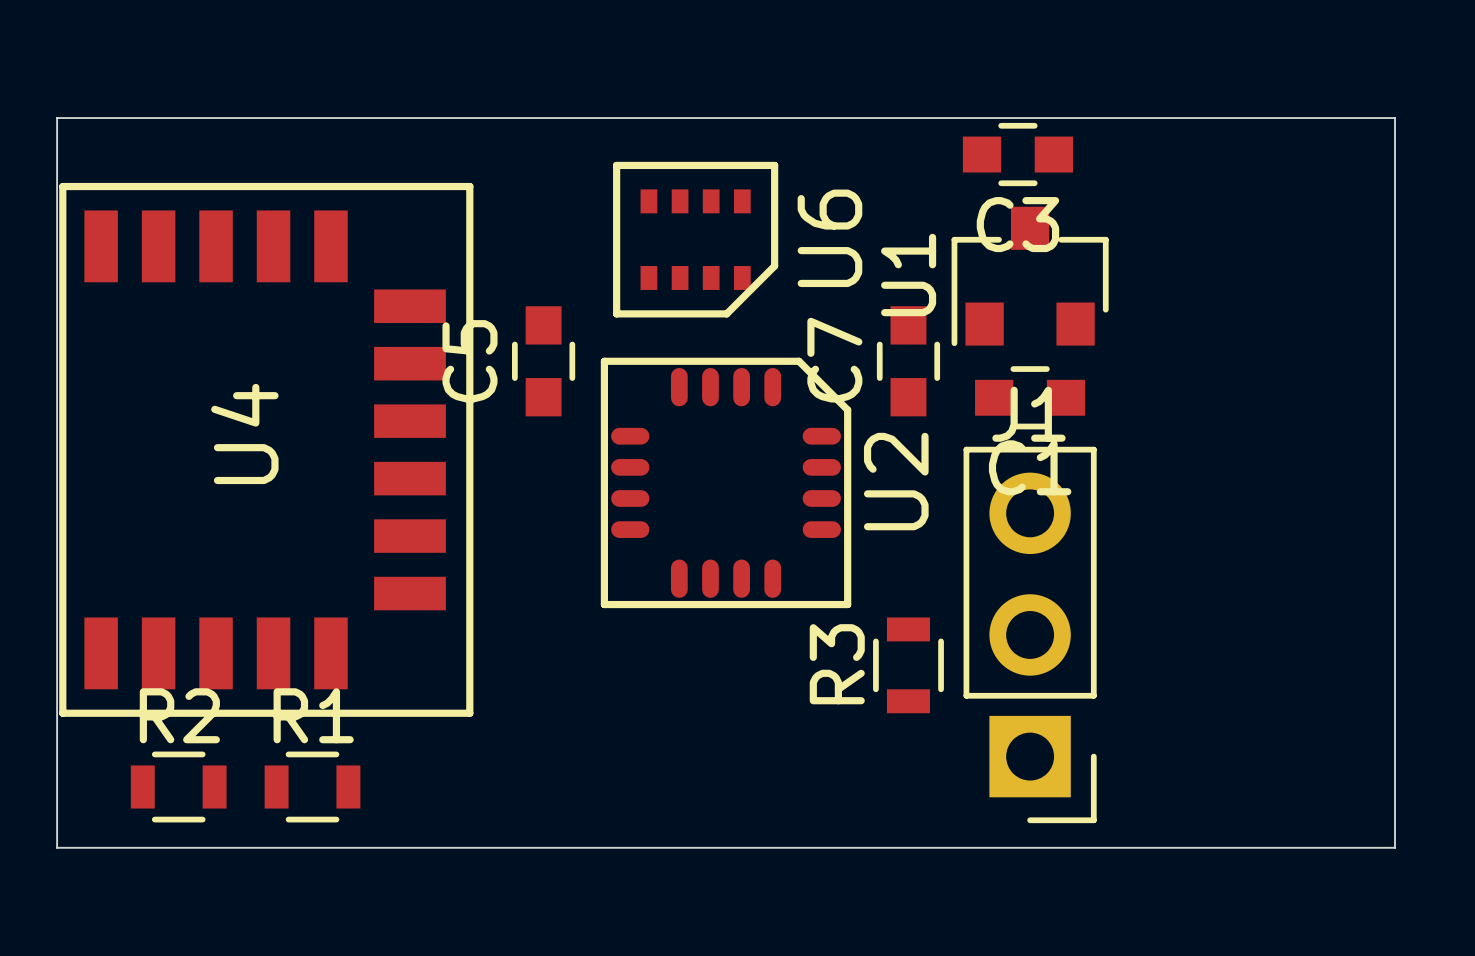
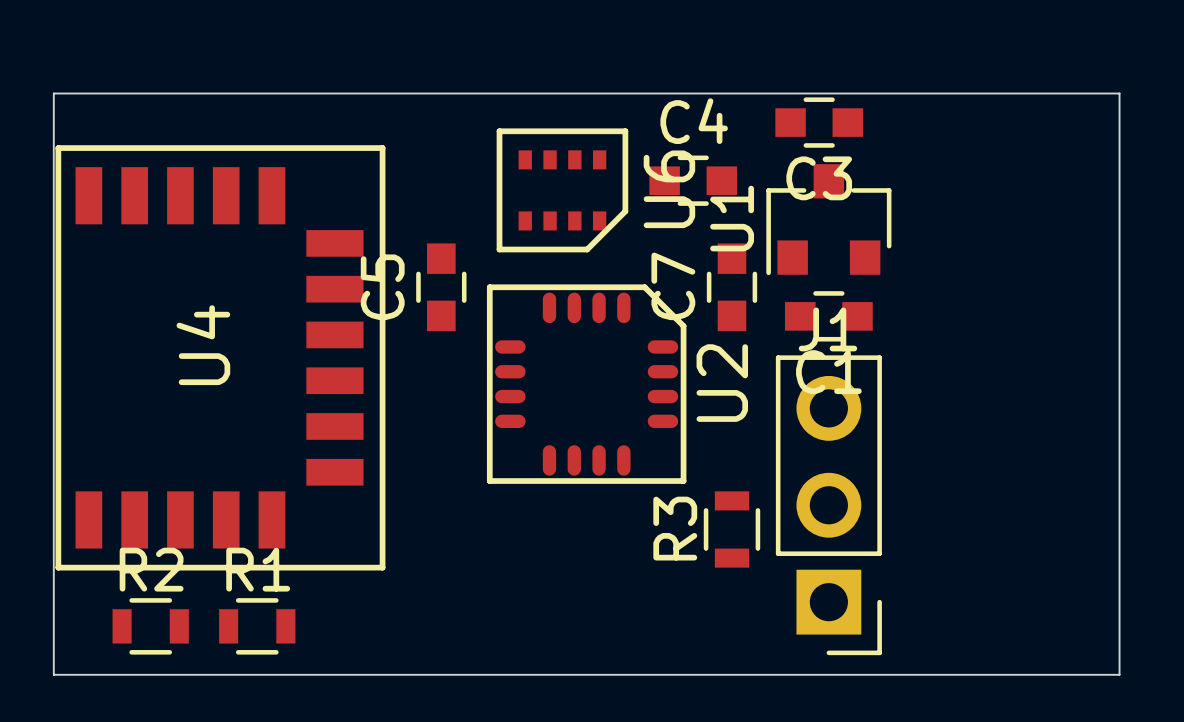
C4: none -> (693, 180)

